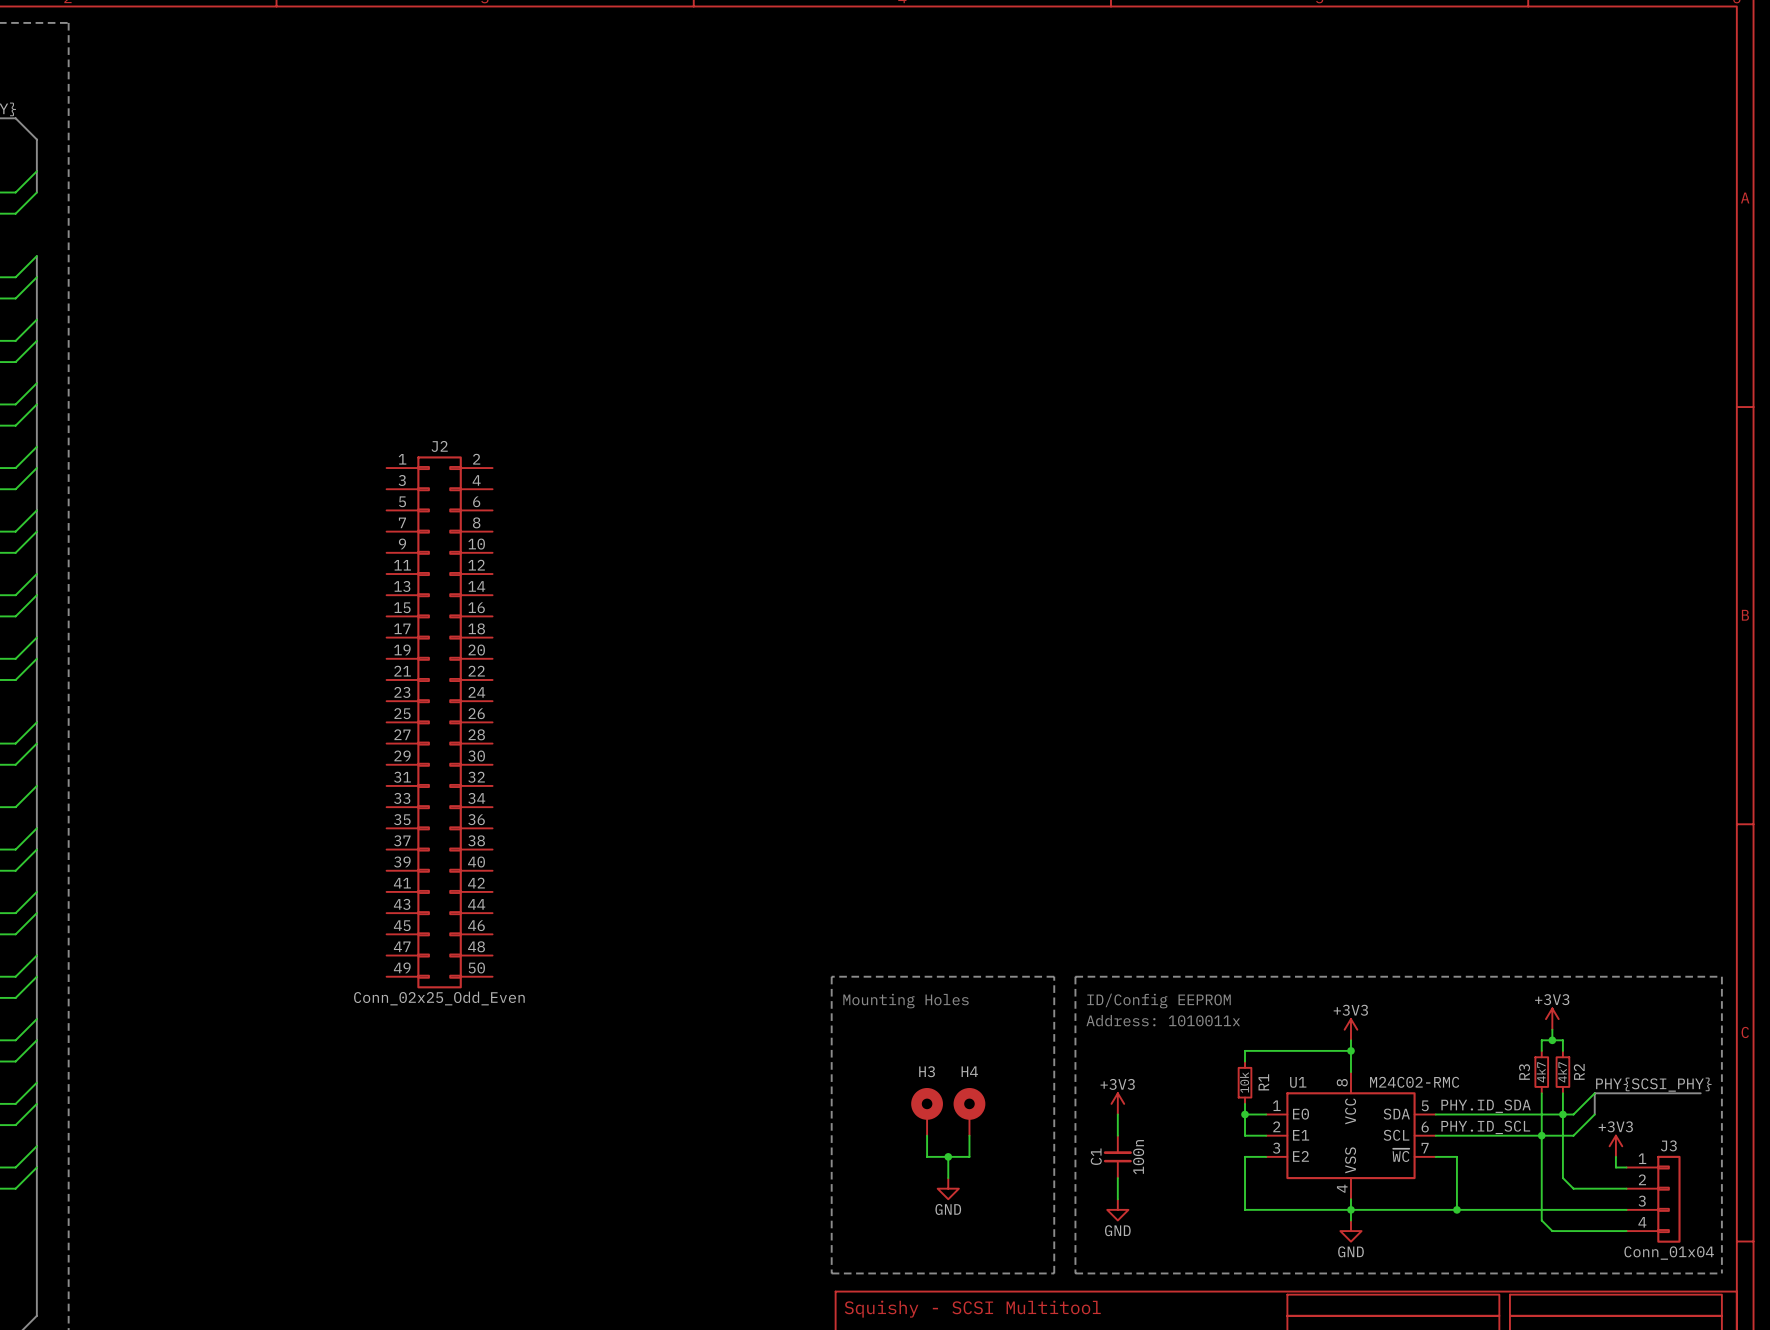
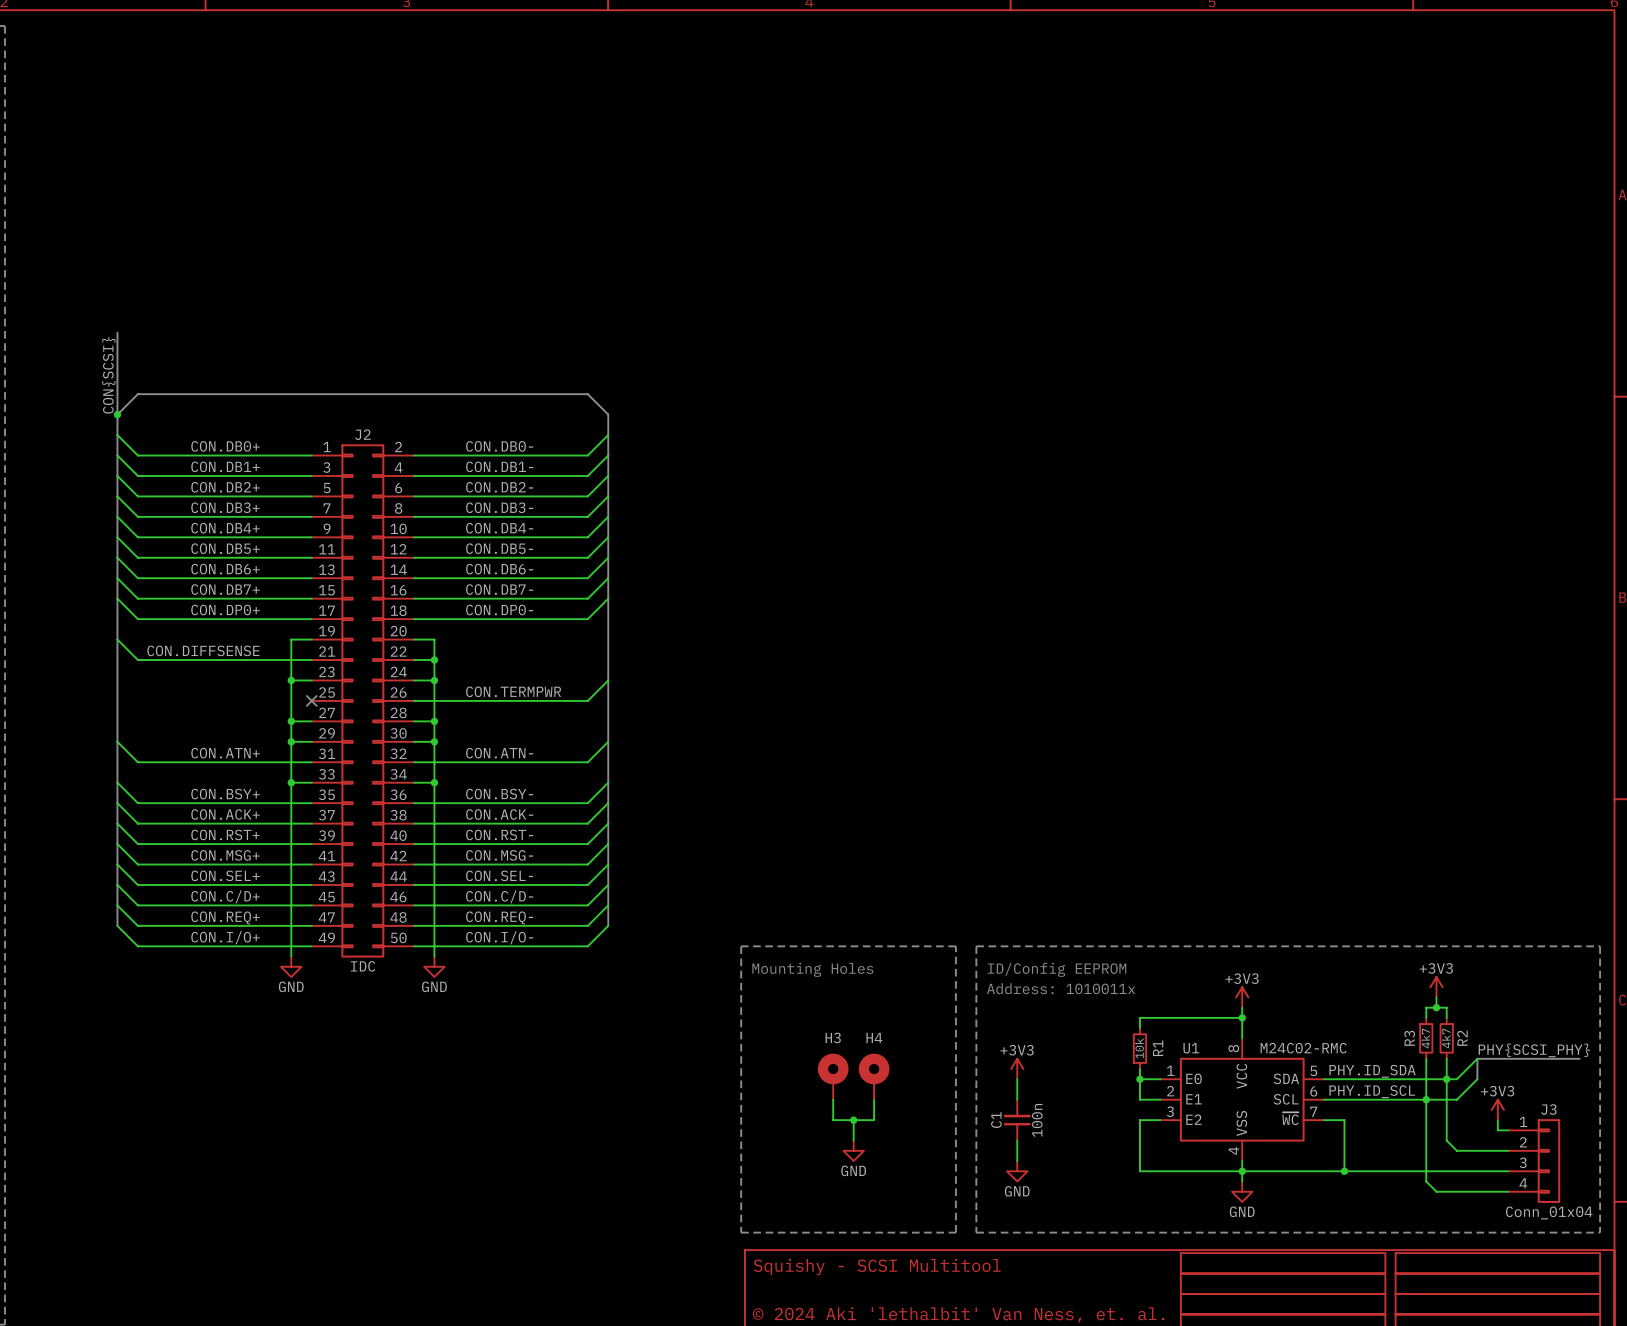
bus: none -> (117, 332) (117, 925)
label: none -> CON{SCSI} (108, 375)
bus: none -> (117, 414) (137, 394) (587, 394) (608, 414) (608, 925)
junction: none -> (117, 414)
wire: none -> (117, 435) (137, 455) (311, 455)
wire: none -> (608, 435) (587, 455) (413, 455)
label: none -> CON.DB0+ (225, 446)
label: none -> CON.DB0- (499, 446)
wire: none -> (117, 455) (137, 475) (311, 475)
wire: none -> (608, 455) (587, 475) (413, 475)
label: none -> CON.DB1+ (225, 466)
label: none -> CON.DB1- (499, 466)
wire: none -> (117, 475) (137, 496) (311, 496)
wire: none -> (608, 475) (587, 496) (413, 496)
label: none -> CON.DB2+ (225, 487)
label: none -> CON.DB2- (499, 487)
wire: none -> (117, 496) (137, 516) (311, 516)
wire: none -> (608, 496) (587, 516) (413, 516)
label: none -> CON.DB3+ (225, 507)
label: none -> CON.DB3- (499, 507)
wire: none -> (117, 516) (137, 537) (311, 537)
wire: none -> (608, 516) (587, 537) (413, 537)
label: none -> CON.DB4+ (225, 528)
label: none -> CON.DB4- (499, 528)
wire: none -> (117, 537) (137, 557) (311, 557)
wire: none -> (608, 537) (587, 557) (413, 557)
label: none -> CON.DB5+ (225, 548)
label: none -> CON.DB5- (499, 548)
wire: none -> (117, 557) (137, 578) (311, 578)
wire: none -> (608, 557) (587, 578) (413, 578)
label: none -> CON.DB6+ (225, 569)
label: none -> CON.DB6- (499, 569)
wire: none -> (117, 578) (137, 598) (311, 598)
wire: none -> (608, 578) (587, 598) (413, 598)
label: none -> CON.DB7+ (225, 589)
label: none -> CON.DB7- (499, 589)
wire: none -> (117, 598) (137, 619) (311, 619)
wire: none -> (608, 598) (587, 619) (413, 619)
label: none -> CON.DP0+ (225, 610)
label: none -> CON.DP0- (499, 610)
wire: none -> (117, 639) (137, 660) (311, 660)
wire: none -> (311, 639) (291, 639) (291, 956)
wire: none -> (413, 639) (434, 639) (434, 956)
label: none -> CON.DIFFSENSE (203, 650)
wire: none -> (413, 660) (434, 660)
junction: none -> (434, 660)
wire: none -> (291, 680) (311, 680)
junction: none -> (291, 680)
wire: none -> (413, 680) (434, 680)
junction: none -> (434, 680)
wire: none -> (608, 680) (587, 700) (413, 700)
label: none -> CON.TERMPWR (513, 691)
no-connect mark: none -> (311, 700)
wire: none -> (291, 721) (311, 721)
junction: none -> (291, 721)
wire: none -> (413, 721) (434, 721)
junction: none -> (434, 721)
wire: none -> (117, 741) (137, 762) (311, 762)
wire: none -> (291, 741) (311, 741)
junction: none -> (291, 741)
wire: none -> (413, 741) (434, 741)
junction: none -> (434, 741)
wire: none -> (608, 741) (587, 762) (413, 762)
label: none -> CON.ATN+ (225, 753)
label: none -> CON.ATN- (499, 753)
wire: none -> (117, 782) (137, 803) (311, 803)
wire: none -> (291, 782) (311, 782)
junction: none -> (291, 782)
wire: none -> (413, 782) (434, 782)
junction: none -> (434, 782)
wire: none -> (608, 782) (587, 803) (413, 803)
label: none -> CON.BSY+ (225, 794)
label: none -> CON.BSY- (499, 794)
wire: none -> (117, 803) (137, 823) (311, 823)
wire: none -> (608, 803) (587, 823) (413, 823)
label: none -> CON.ACK+ (225, 814)
label: none -> CON.ACK- (499, 814)
wire: none -> (117, 823) (137, 844) (311, 844)
wire: none -> (608, 823) (587, 844) (413, 844)
label: none -> CON.RST+ (225, 834)
label: none -> CON.RST- (499, 834)
wire: none -> (117, 844) (137, 864) (311, 864)
wire: none -> (608, 844) (587, 864) (413, 864)
label: none -> CON.MSG+ (225, 855)
label: none -> CON.MSG- (499, 855)
wire: none -> (117, 864) (137, 884) (311, 884)
wire: none -> (608, 864) (587, 884) (413, 884)
label: none -> CON.SEL+ (225, 875)
label: none -> CON.SEL- (499, 875)
wire: none -> (117, 884) (137, 905) (311, 905)
wire: none -> (608, 884) (587, 905) (413, 905)
label: none -> CON.C/D+ (225, 896)
label: none -> CON.C/D- (499, 896)
wire: none -> (117, 905) (137, 925) (311, 925)
wire: none -> (608, 905) (587, 925) (413, 925)
label: none -> CON.REQ+ (225, 917)
label: none -> CON.REQ- (499, 917)
wire: none -> (117, 925) (137, 946) (311, 946)
wire: none -> (608, 925) (587, 946) (413, 946)
label: none -> CON.I/O+ (225, 937)
label: none -> CON.I/O- (499, 937)
power symbol: none -> GND (291, 966)
power symbol: none -> GND (434, 966)
J2 value: Conn_02x25_Odd_Even (439, 998) -> IDC (363, 966)

